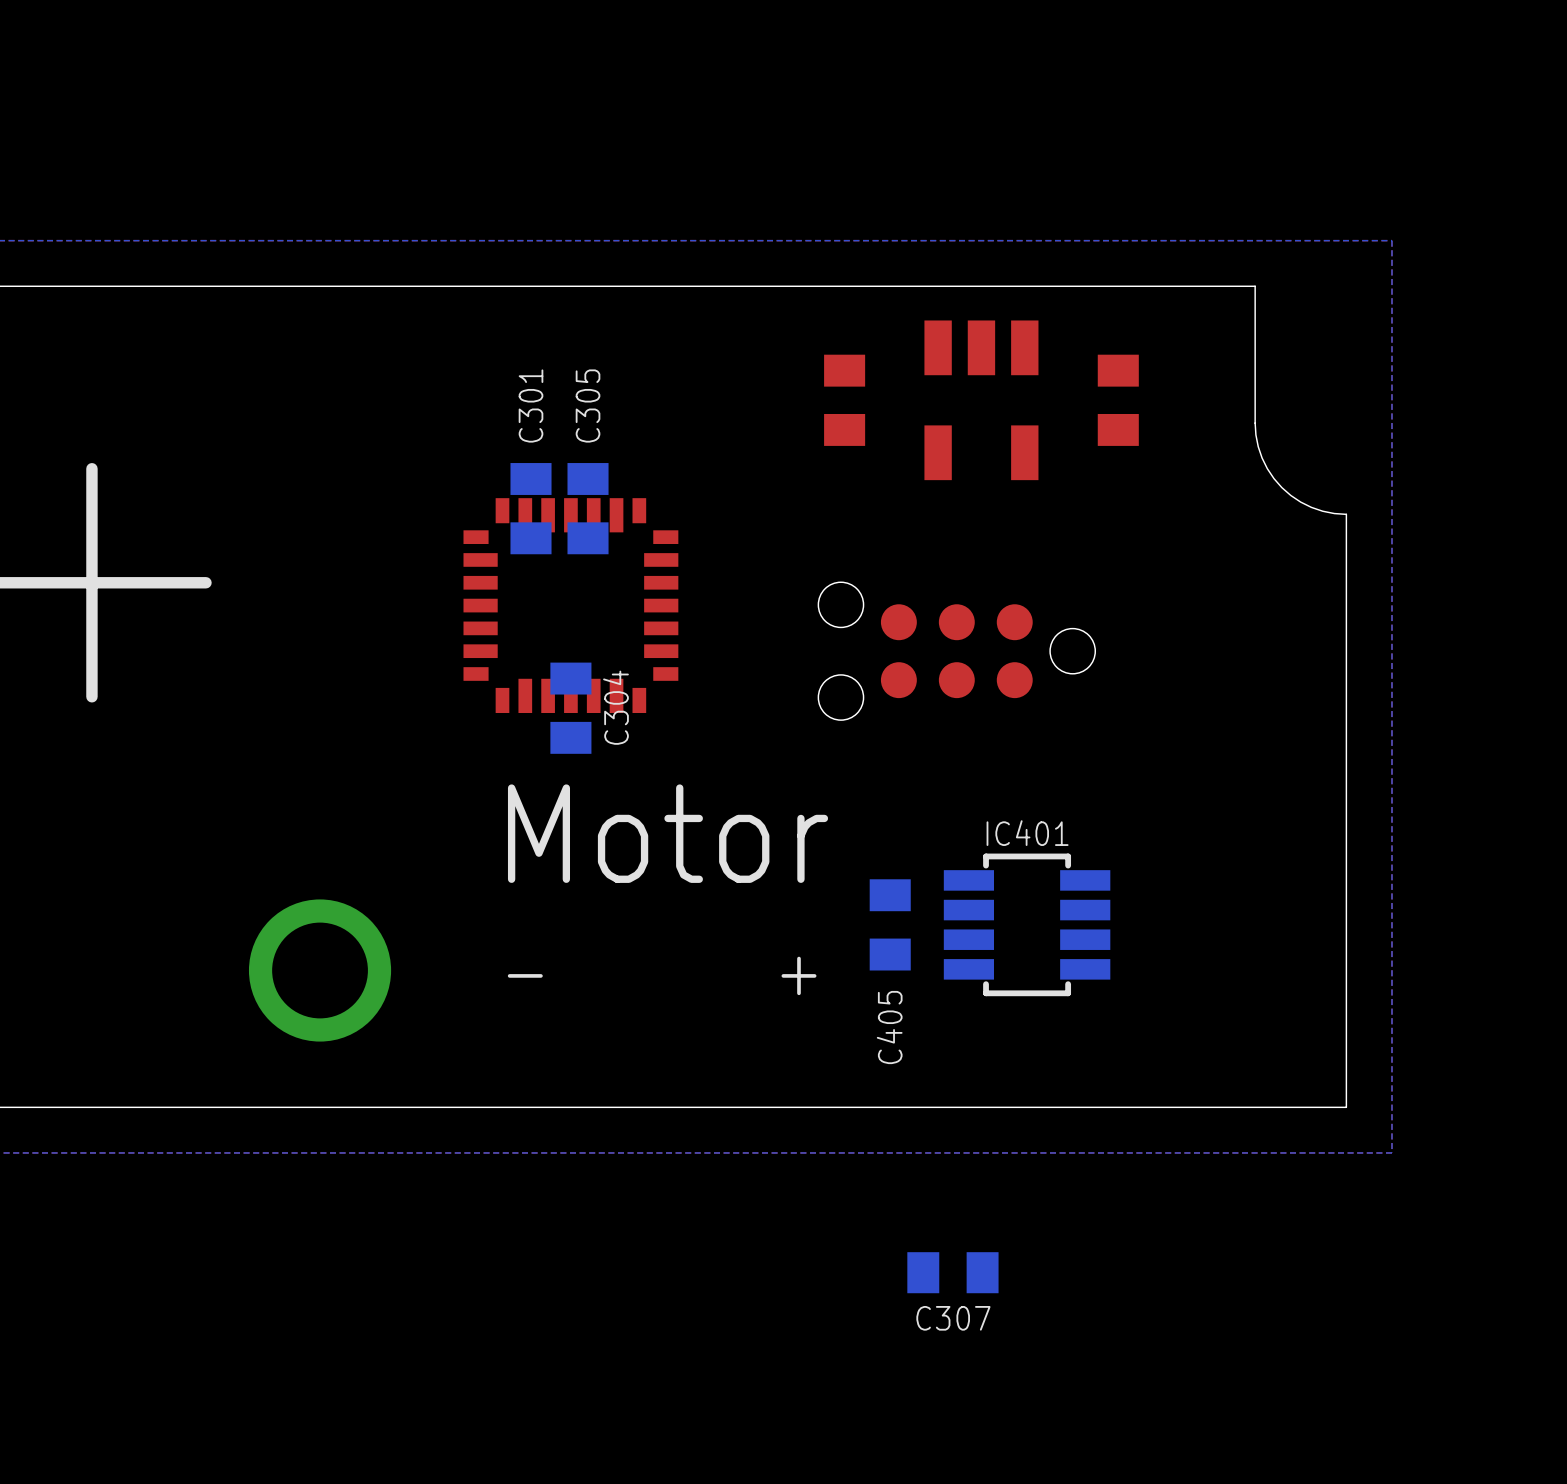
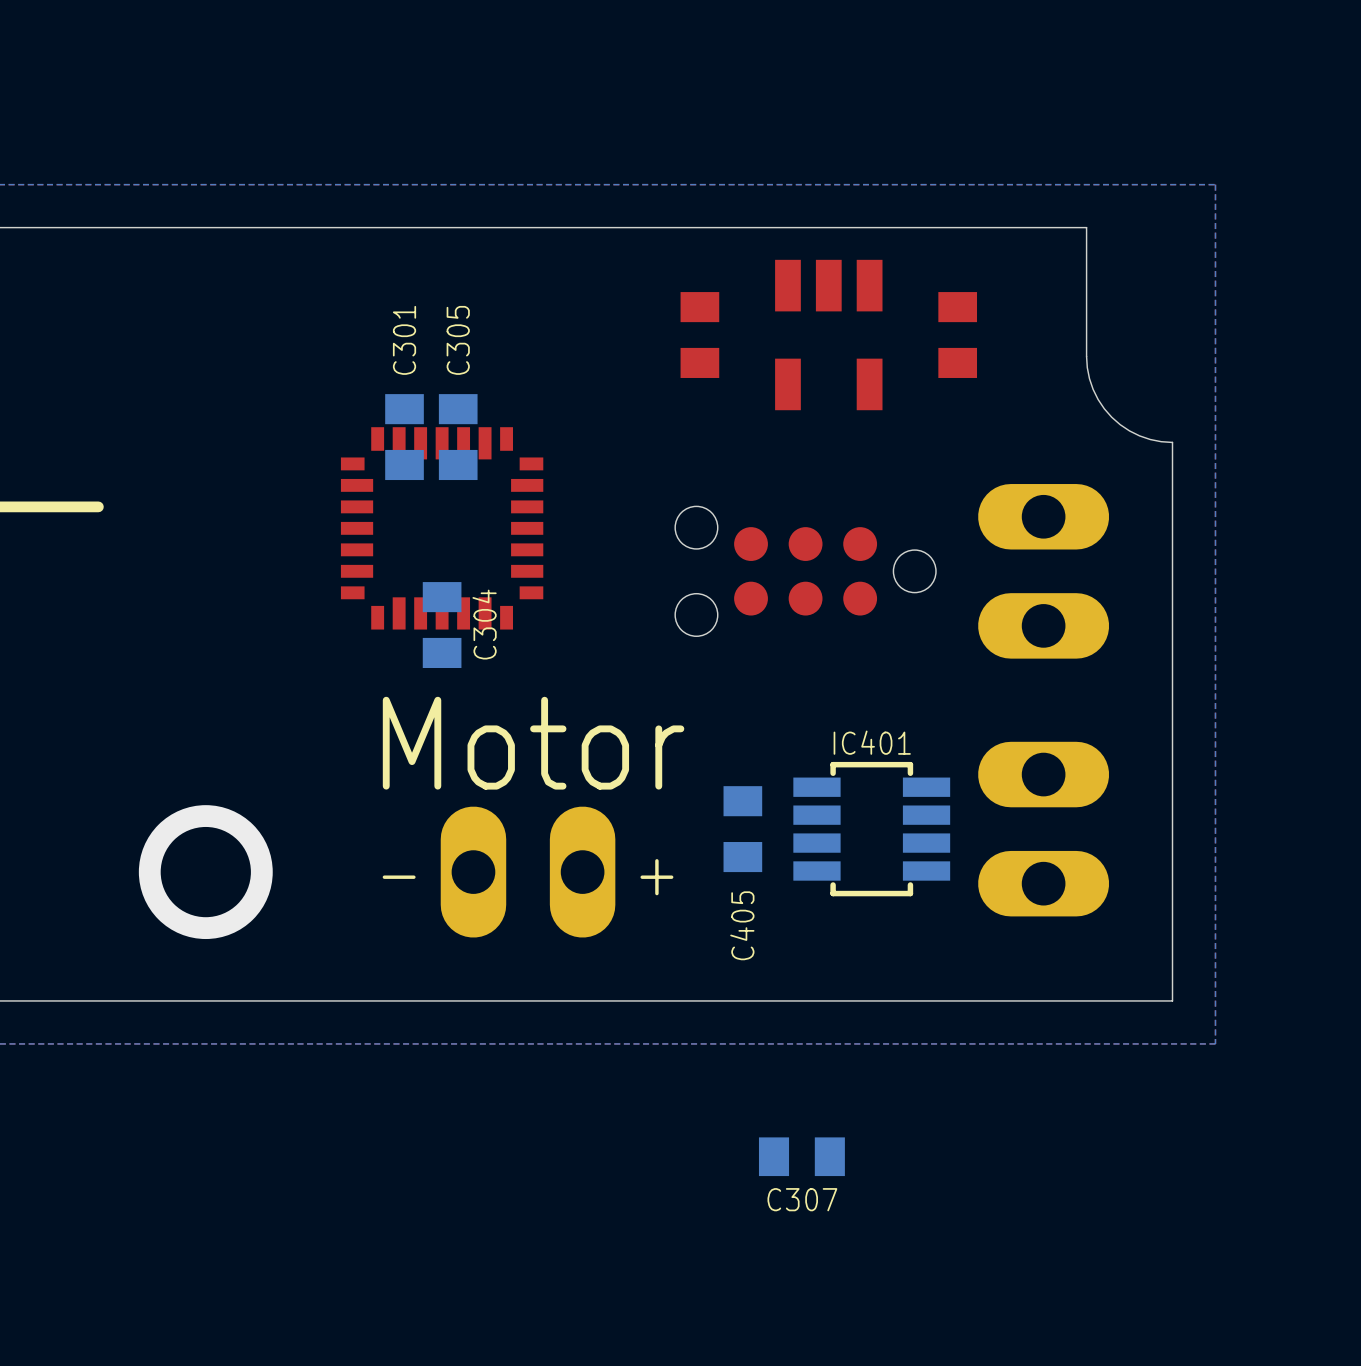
part: none -> (1043, 571)
part: none -> (1043, 829)
part: none -> (528, 872)

